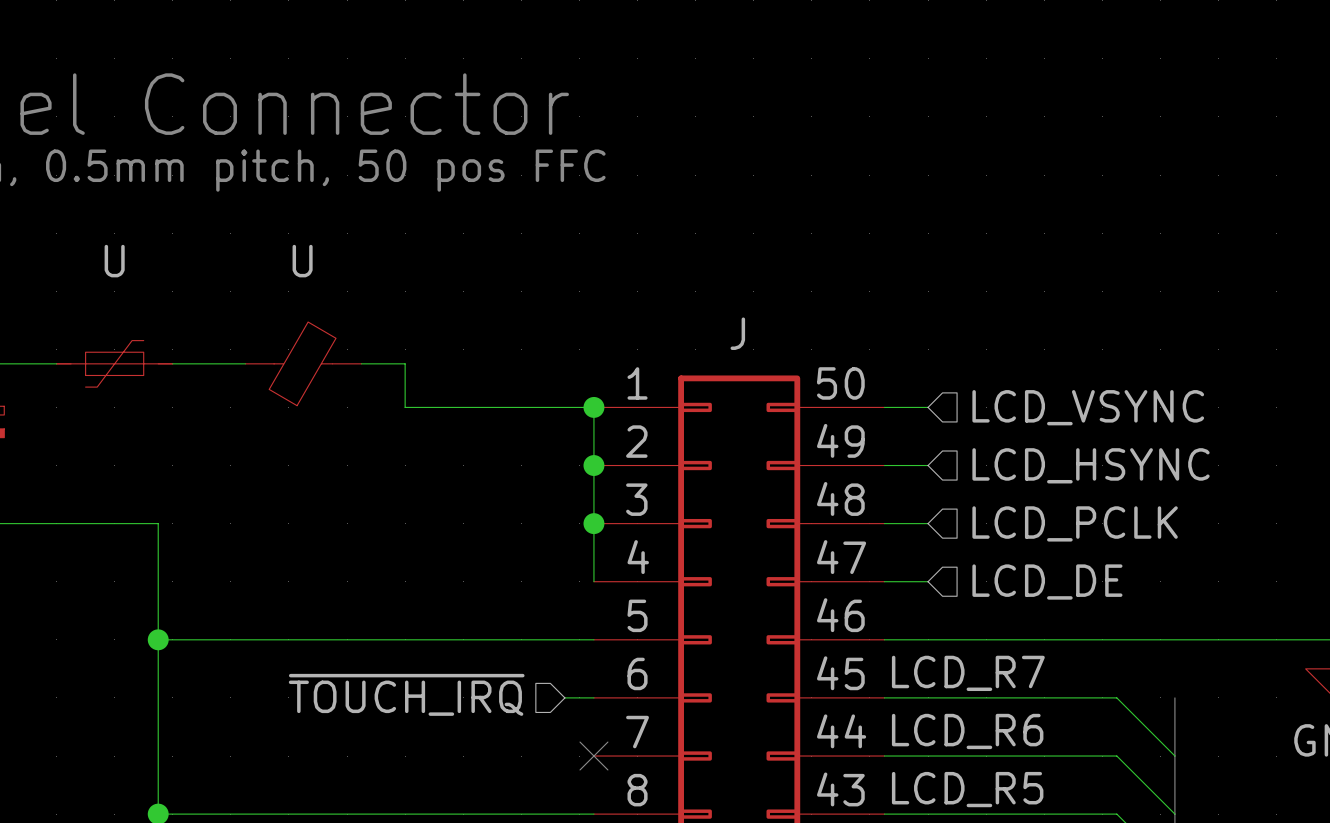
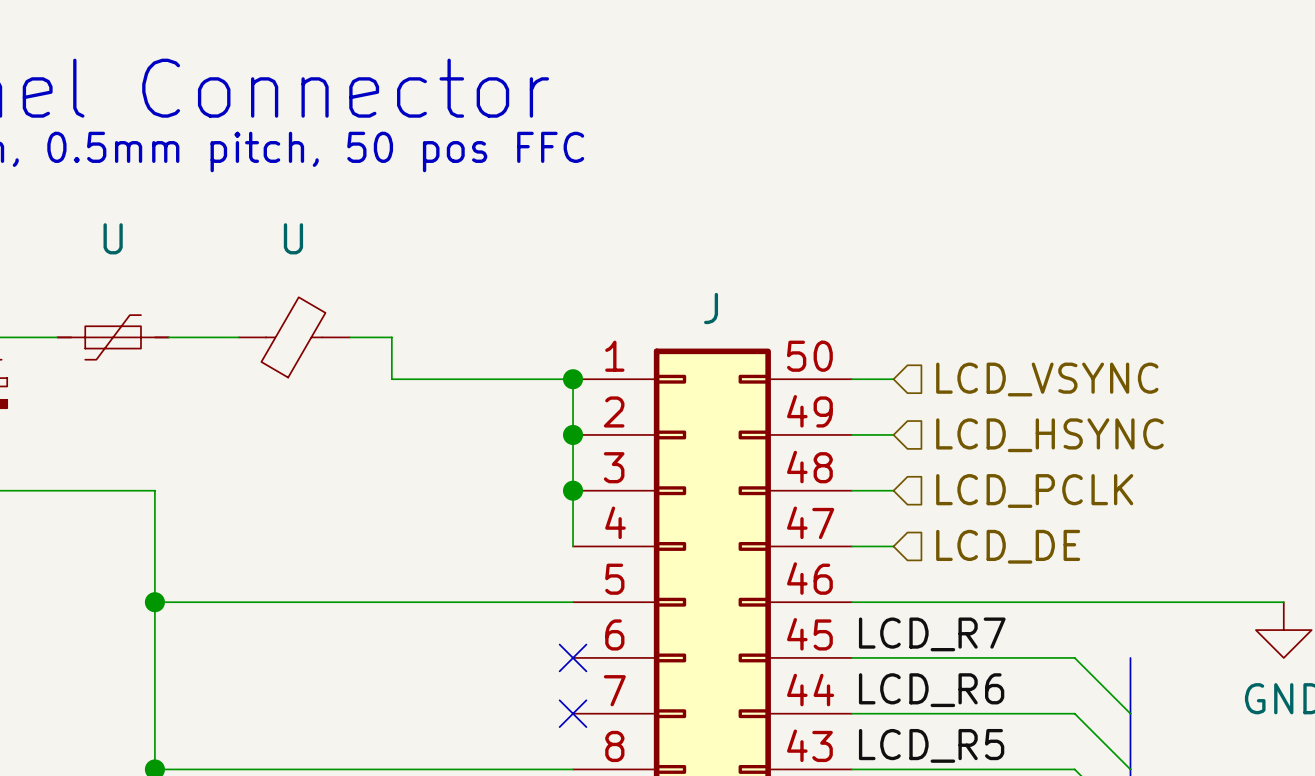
hierarchical label: ~{TOUCH_IRQ} (406, 694) -> none
wire: (564, 697) (593, 697) -> none
no-connect mark: none -> (573, 657)

